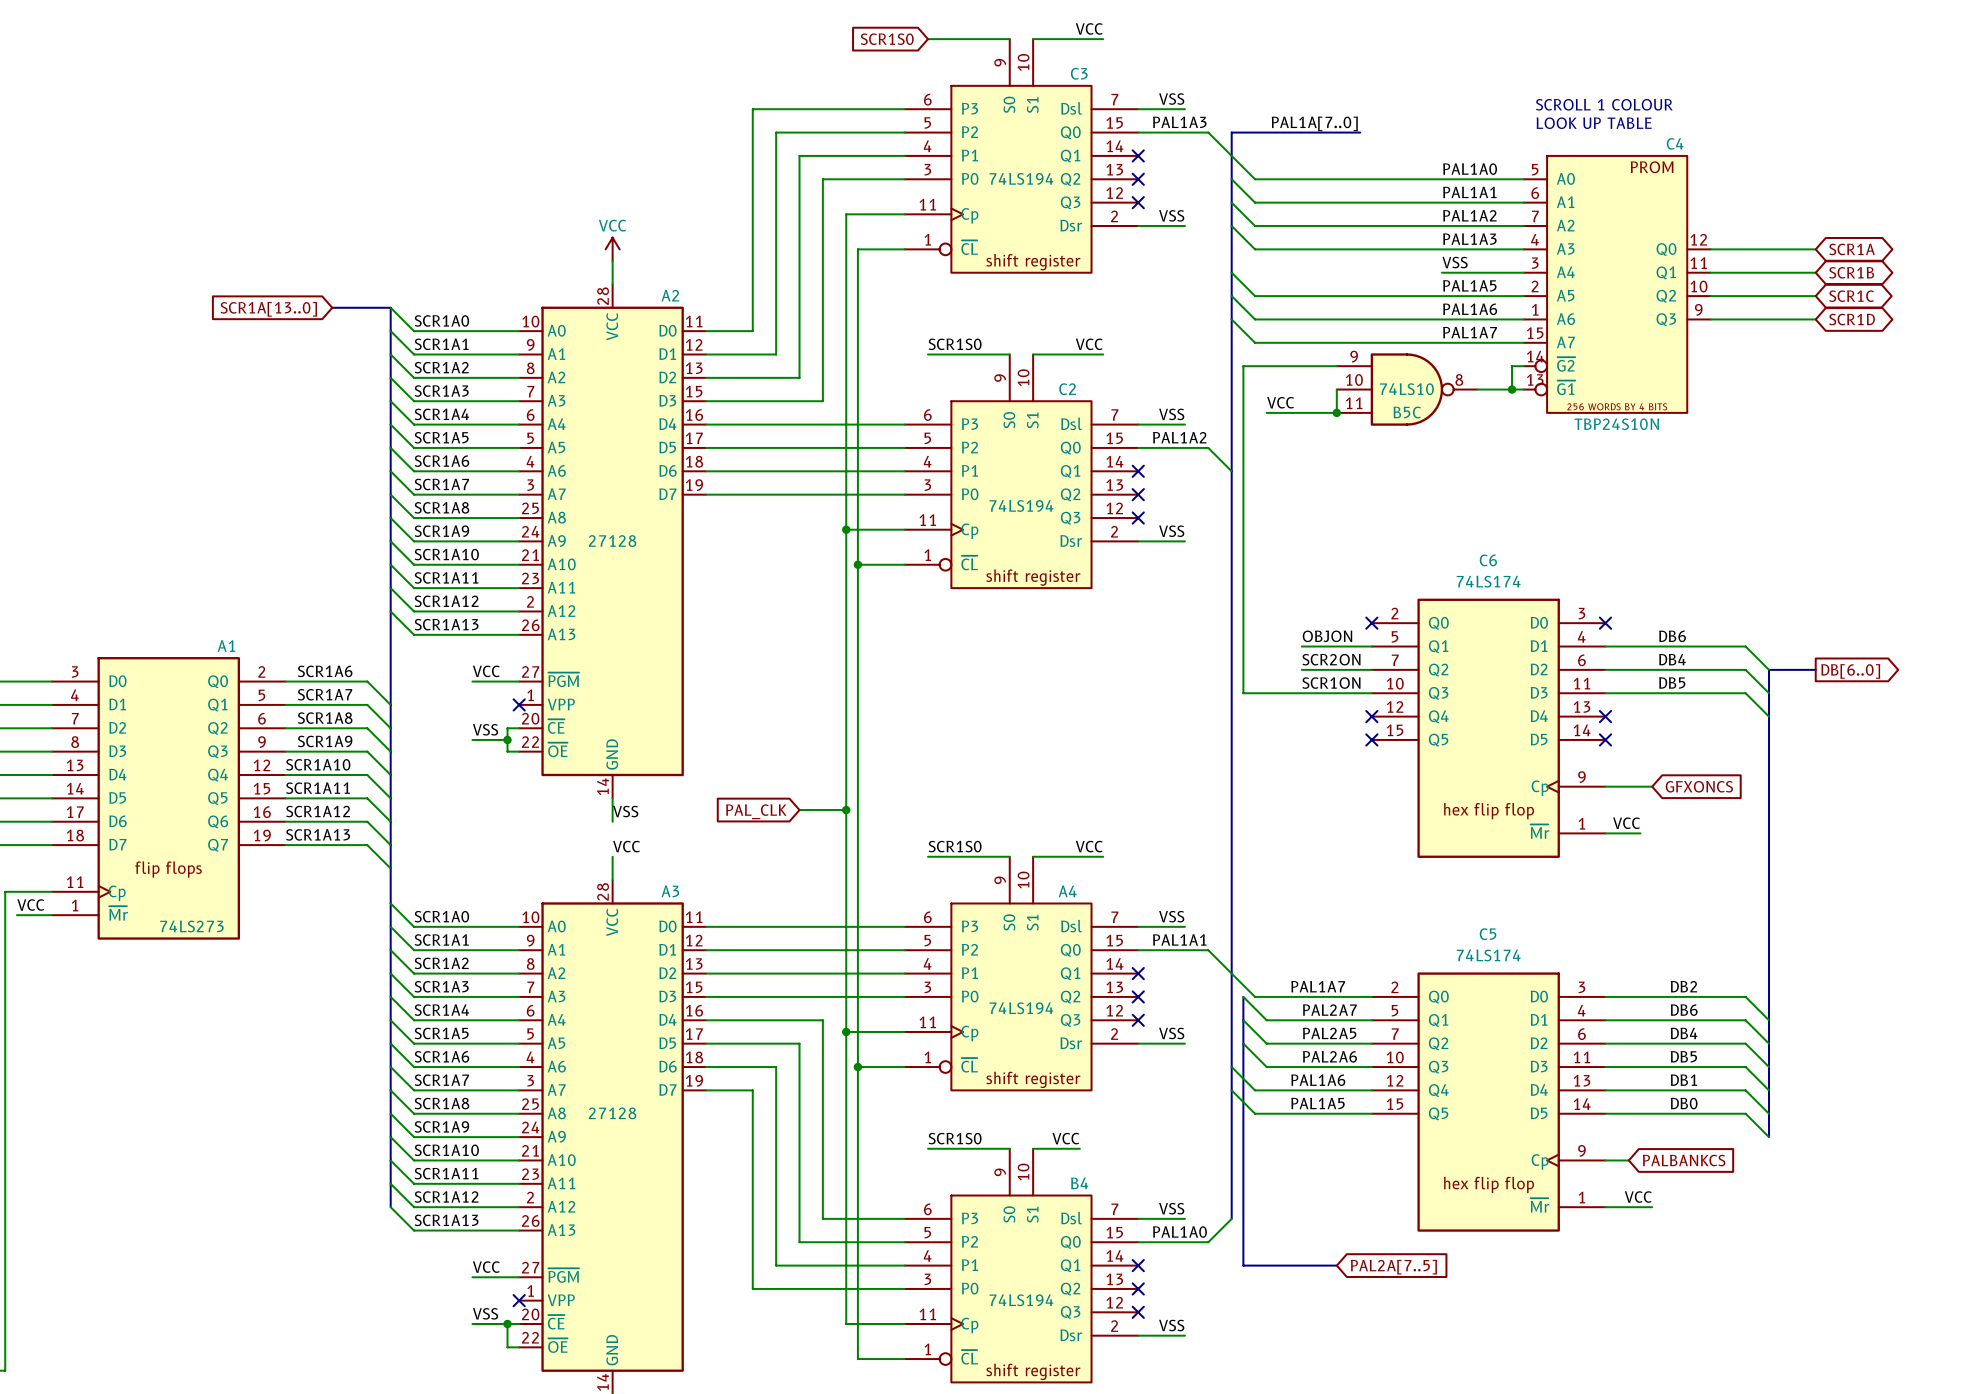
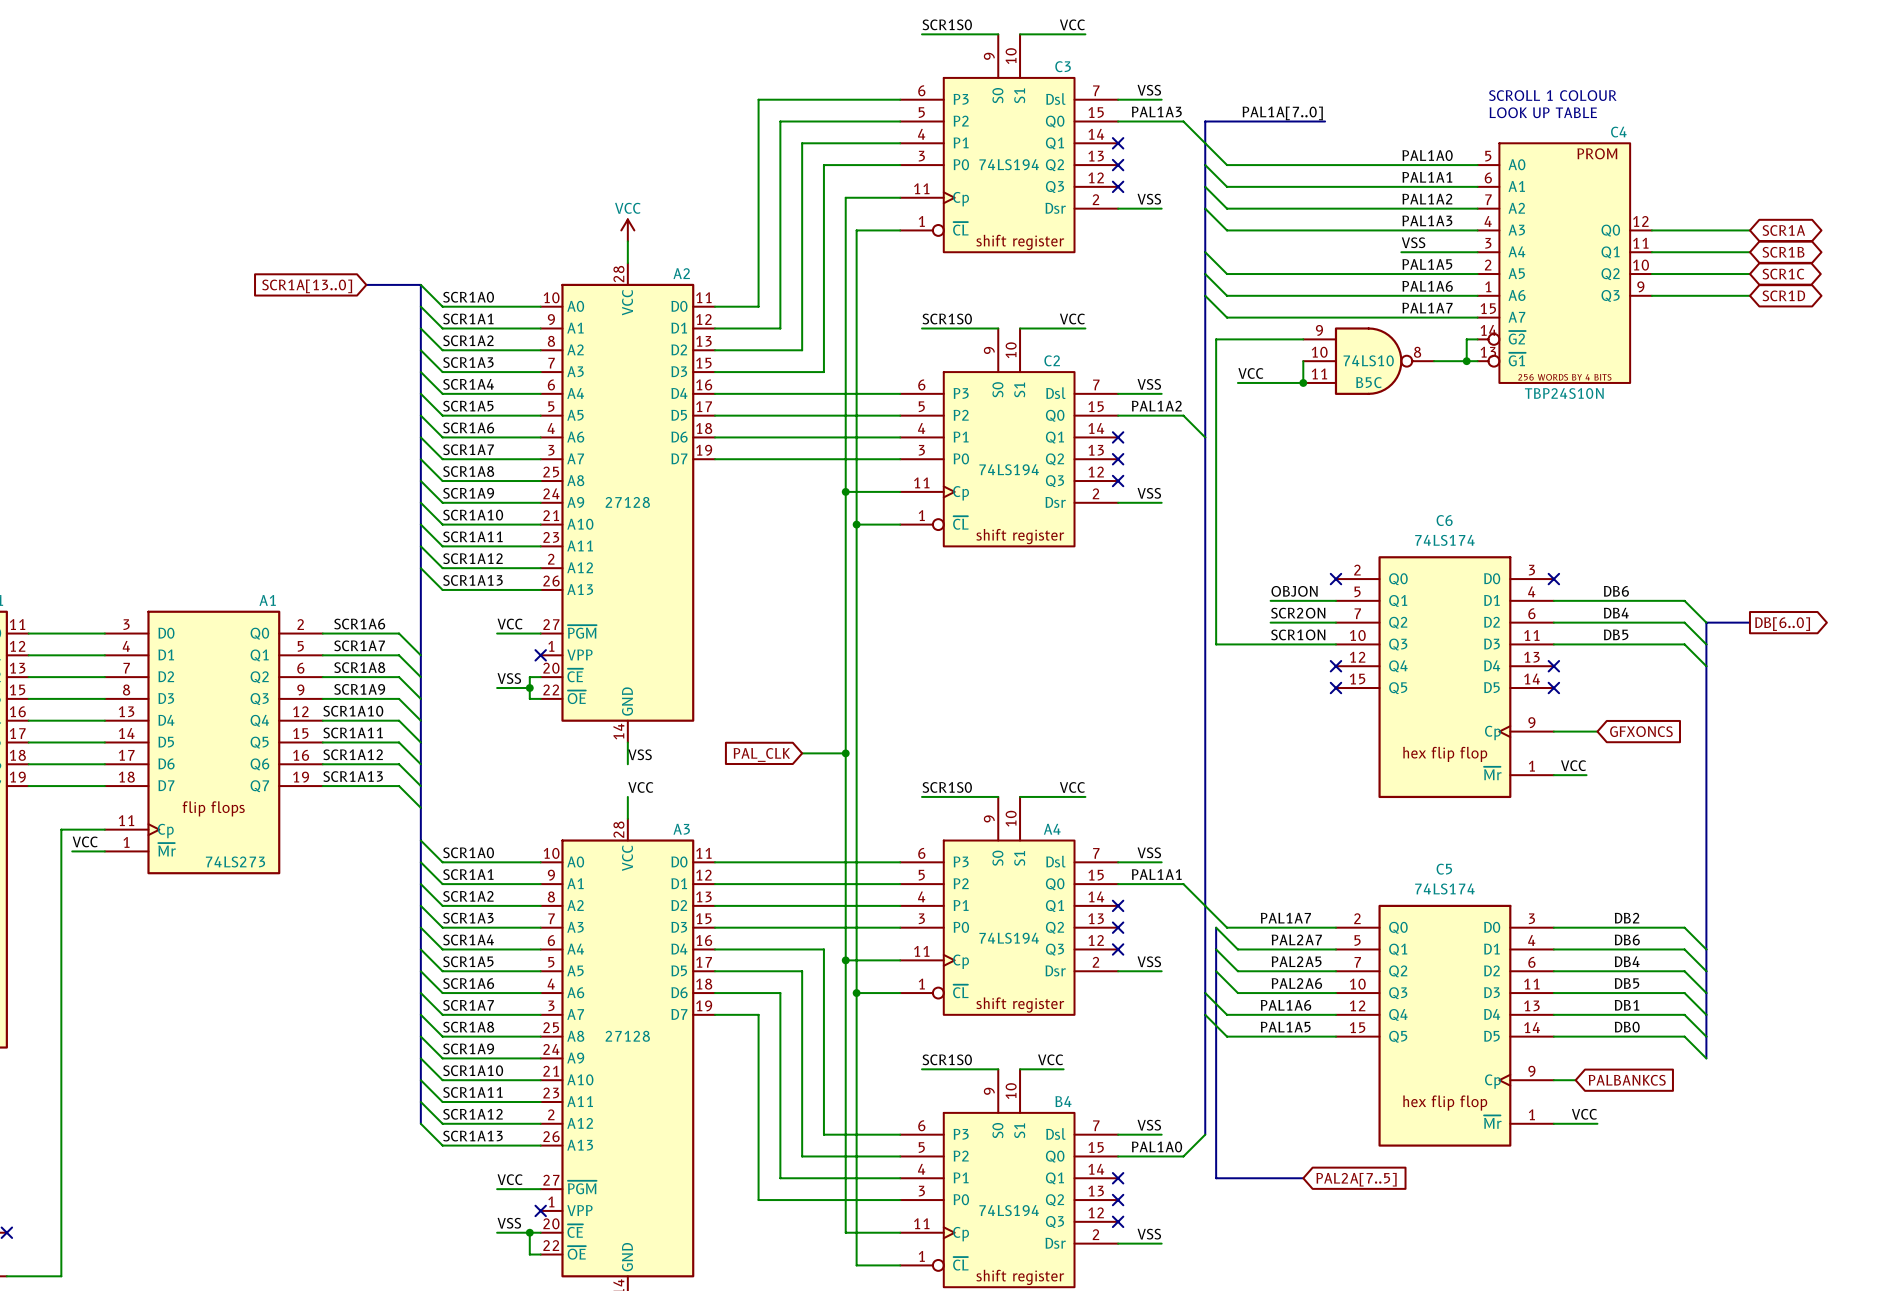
label: none -> SCR1S0 (947, 24)
global label: SCR1S0 (887, 39) -> none

